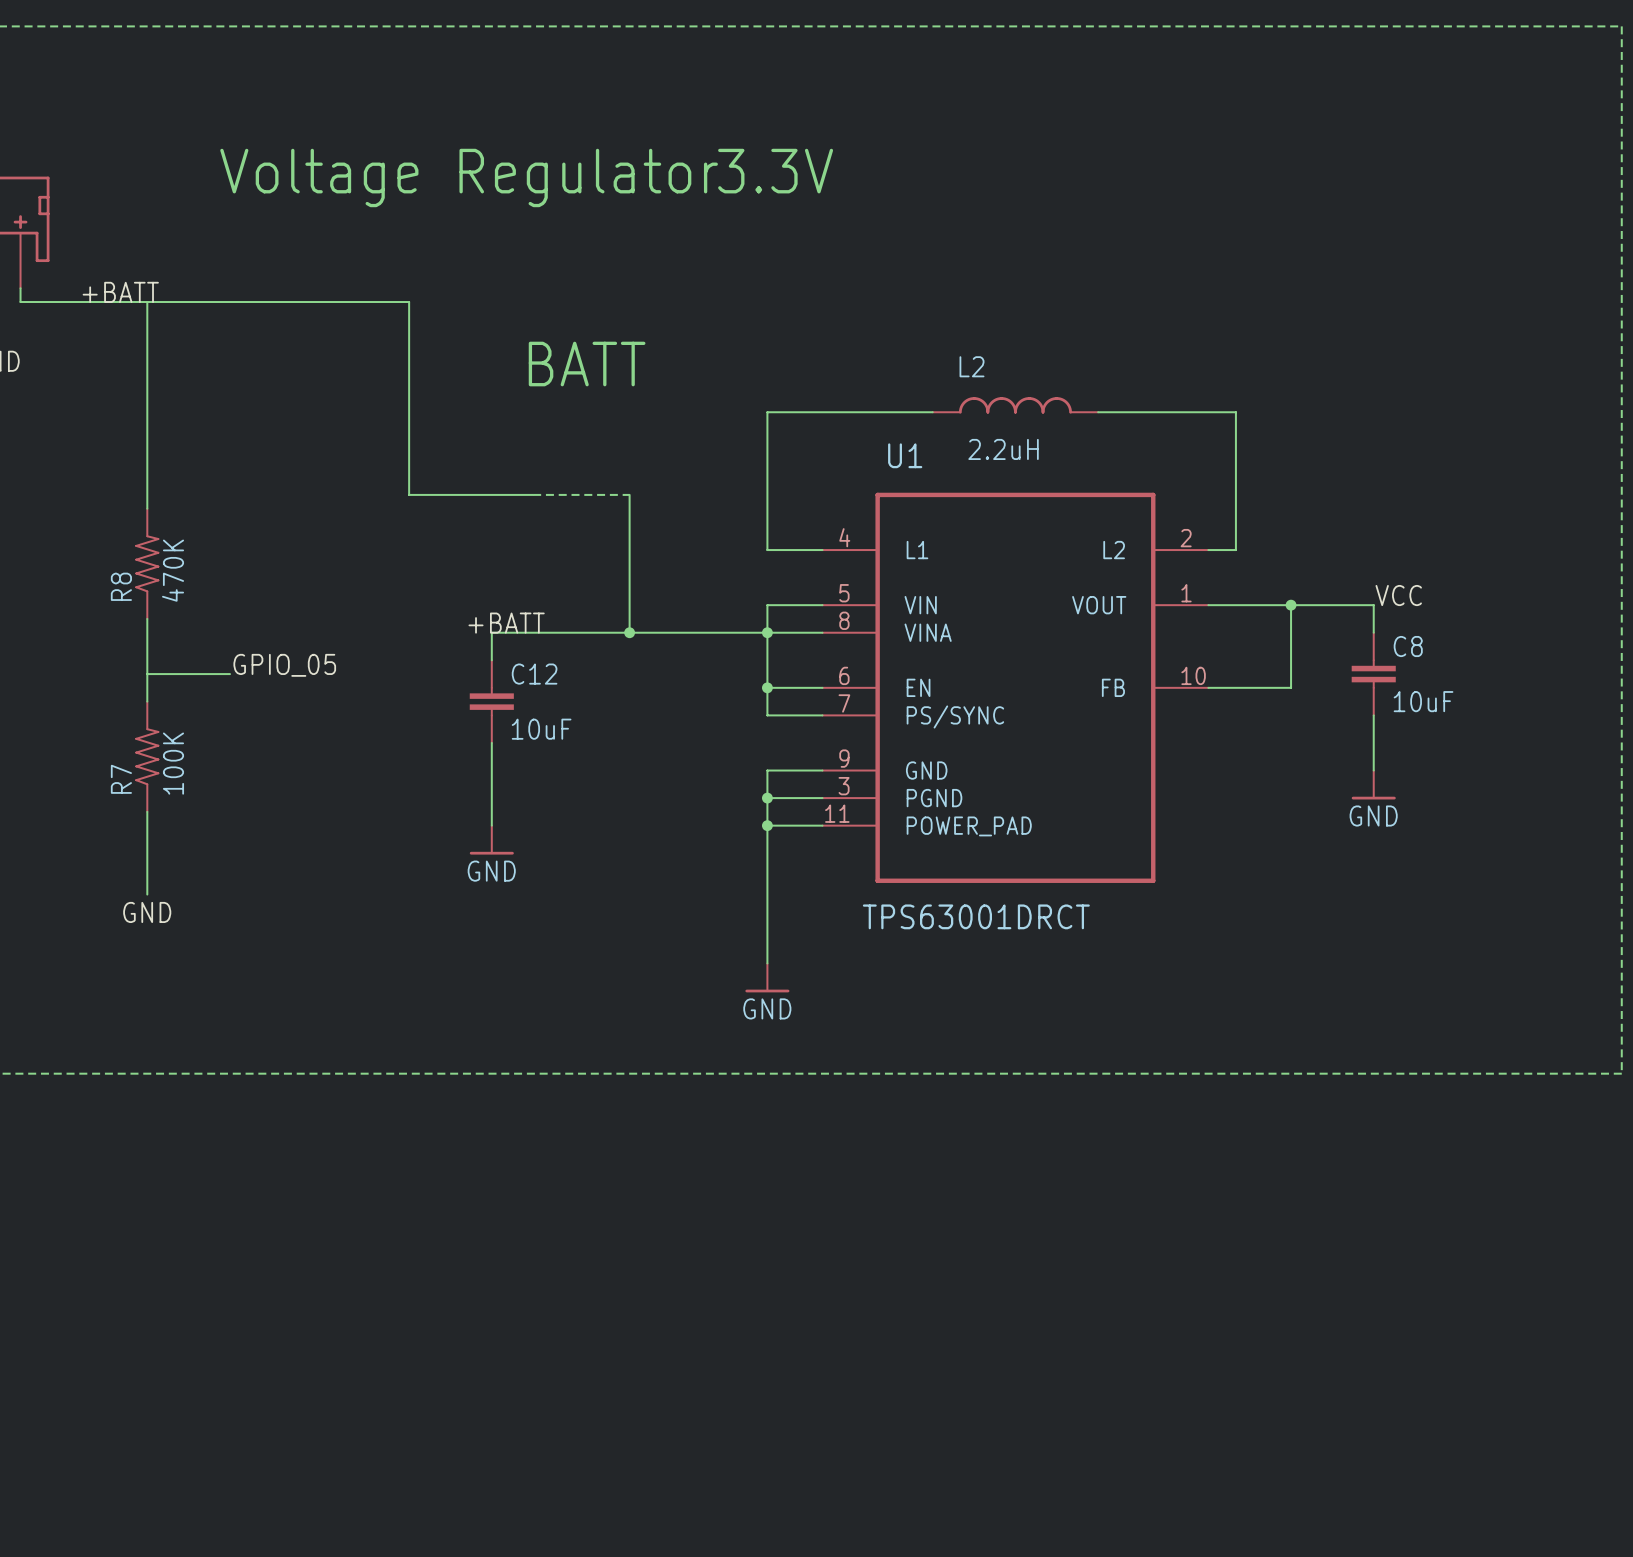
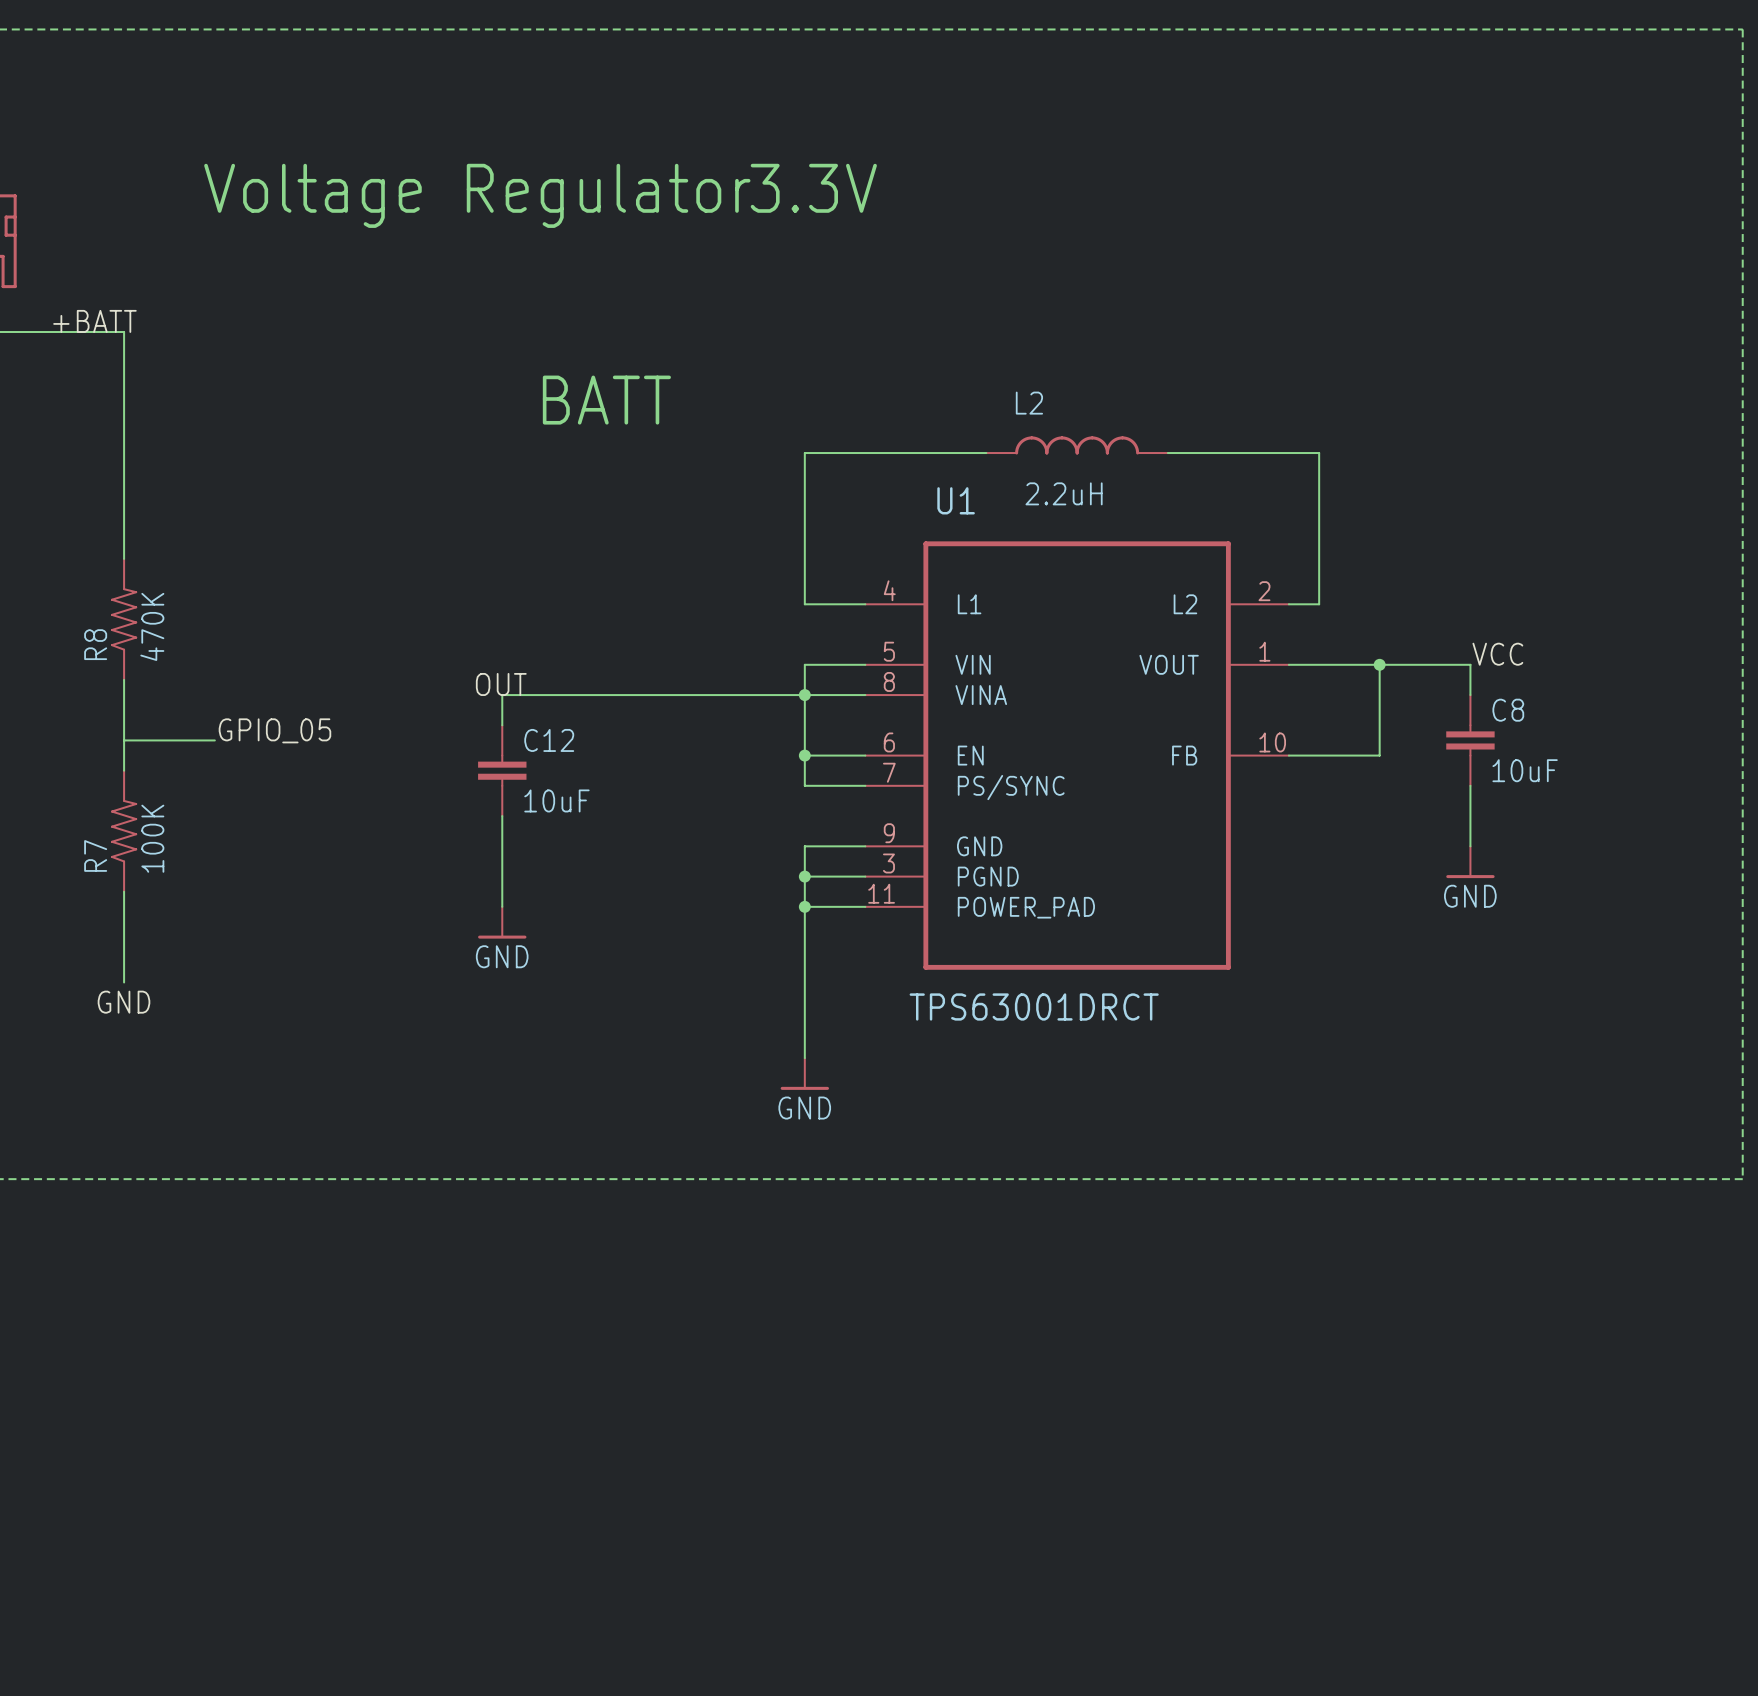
wire: (147, 302) (409, 302) (409, 494) (629, 494) (629, 632) -> none
label: +BATT (506, 623) -> OUT (501, 684)
junction: (629, 632) -> none

